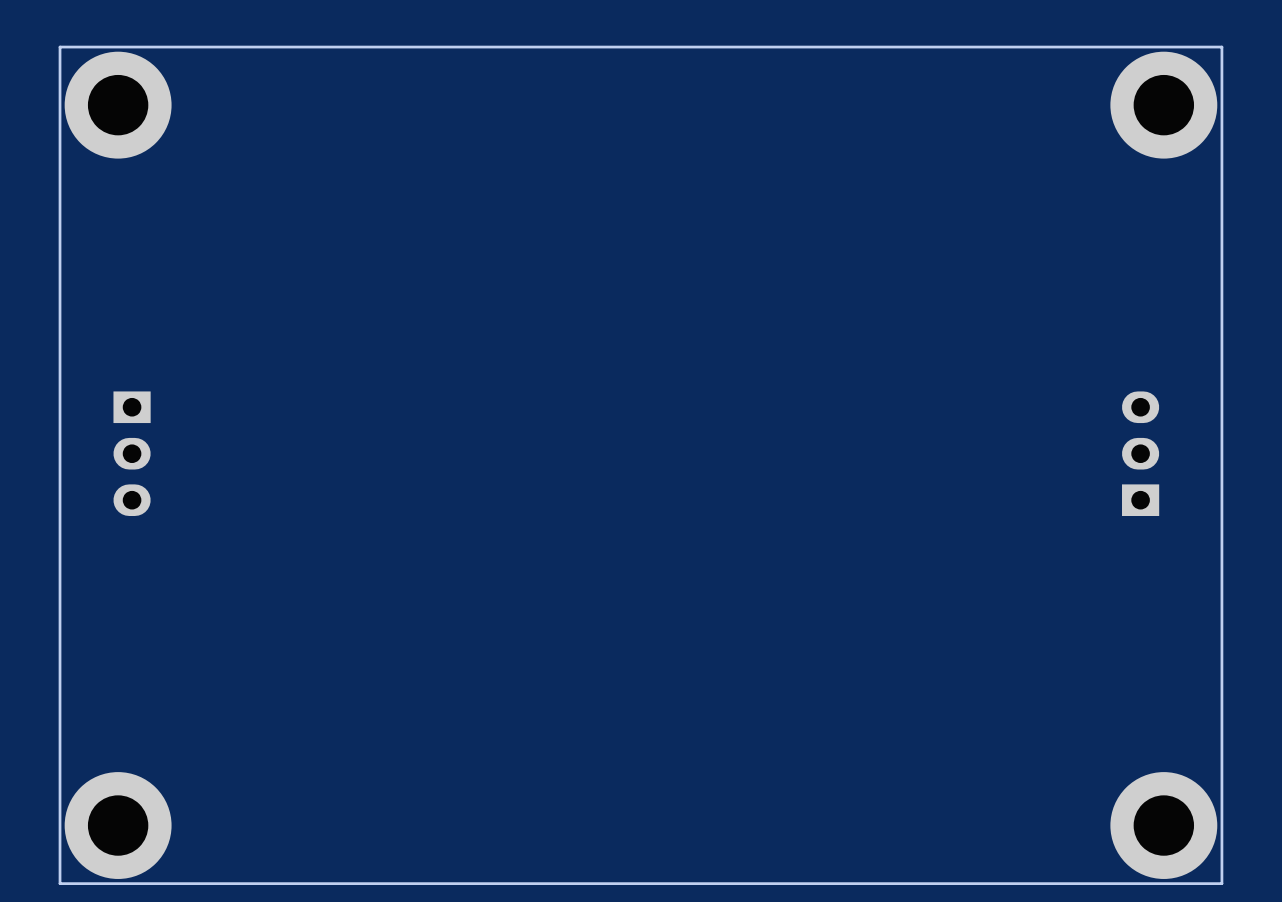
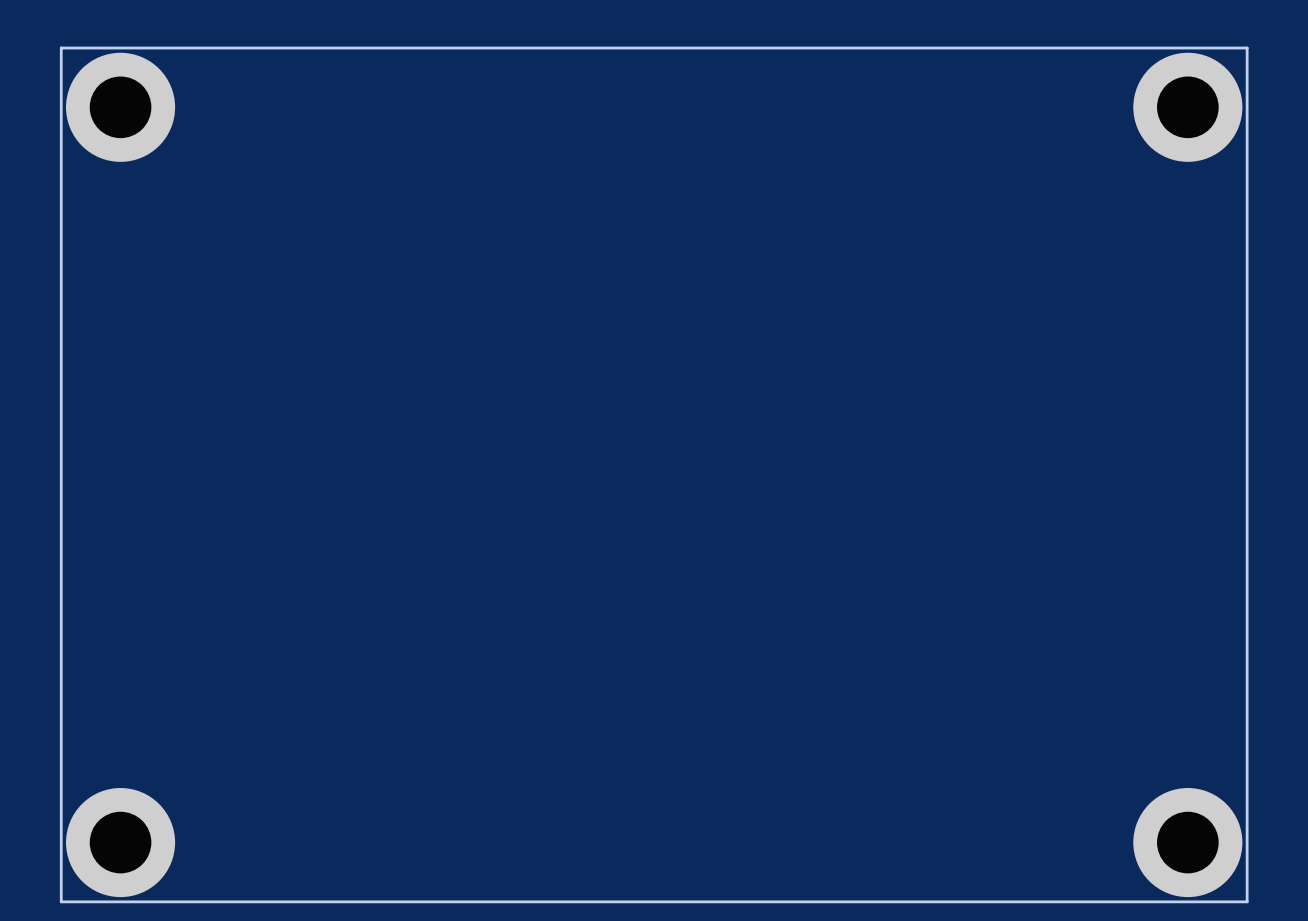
part: (132, 453) -> none
part: (1140, 453) -> none

